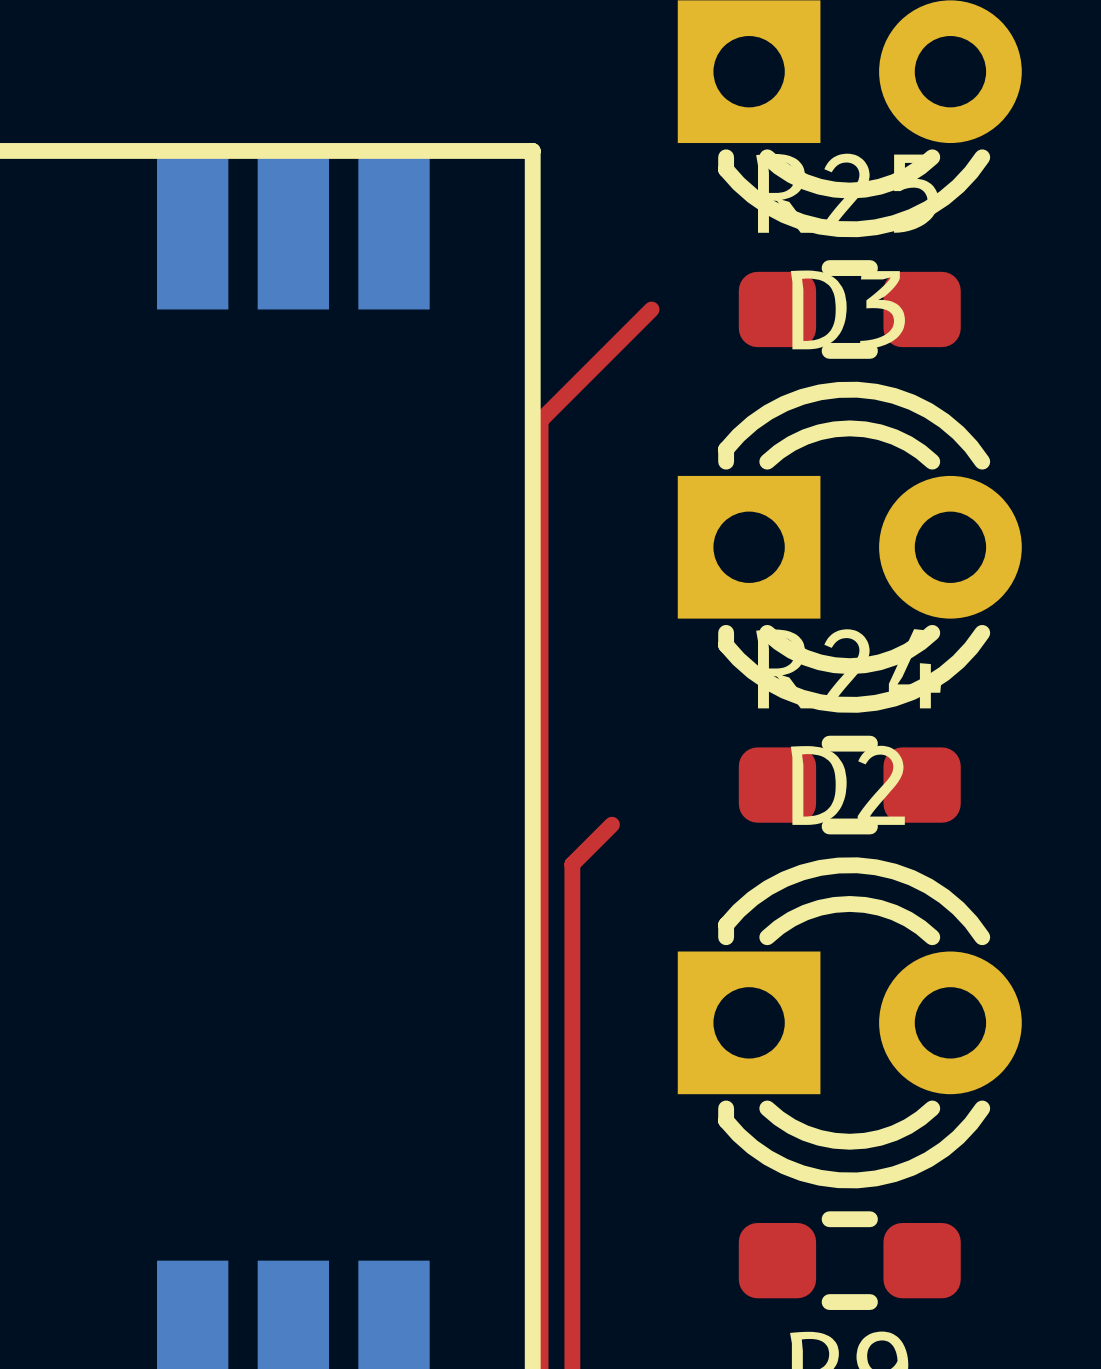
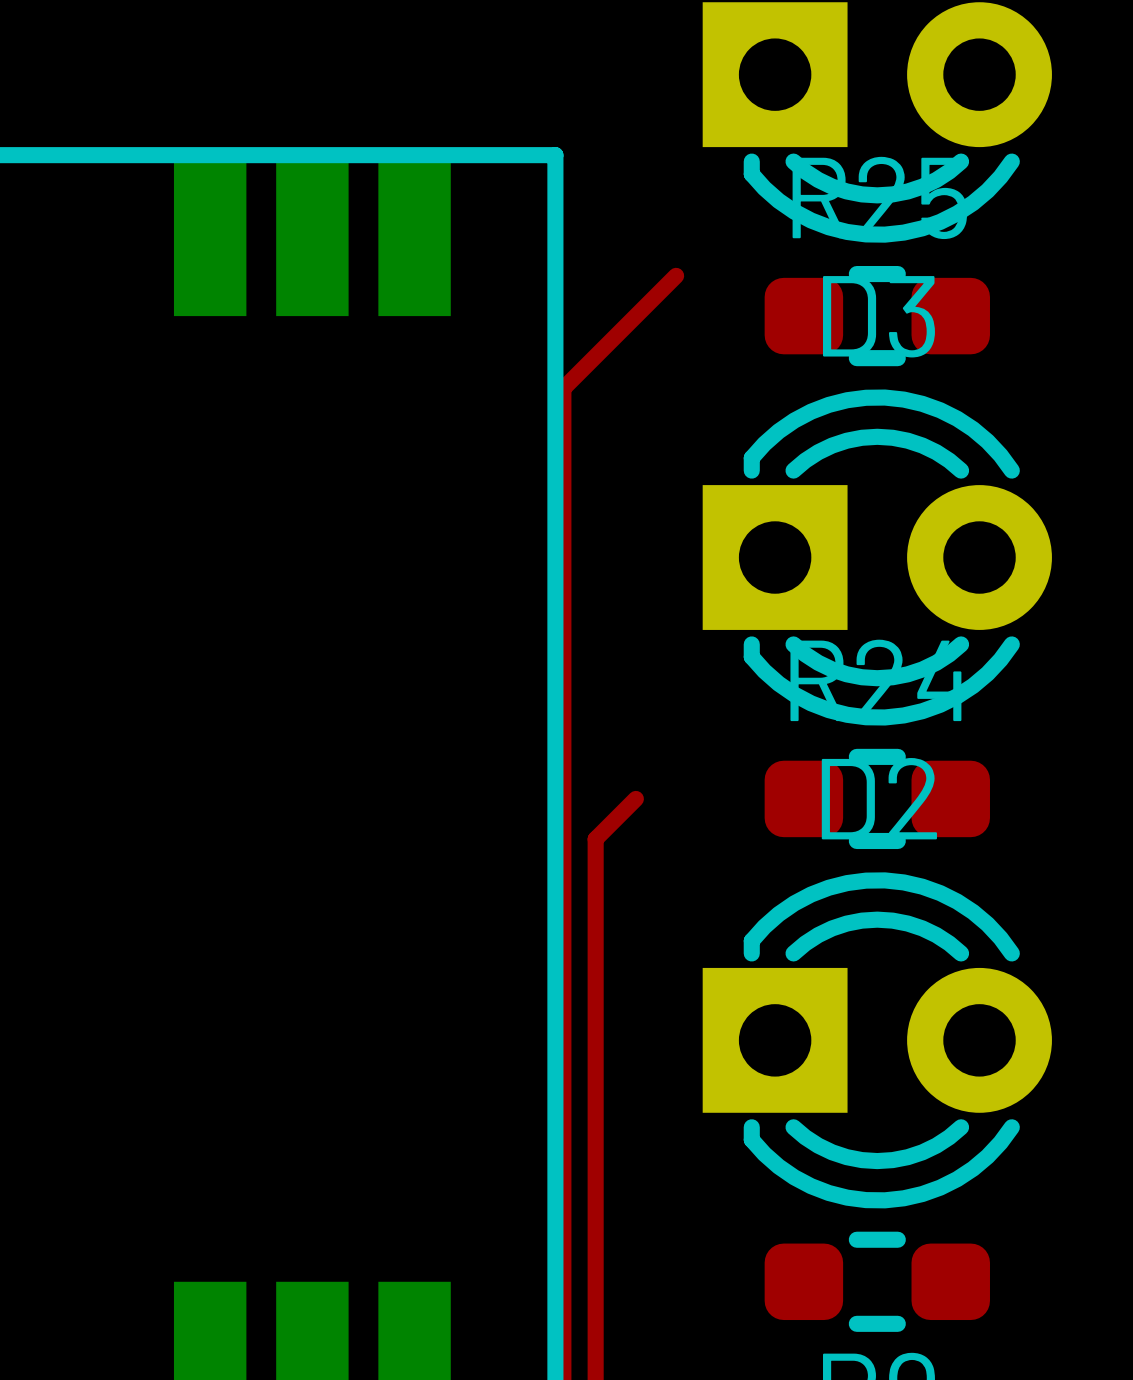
top track: (651, 309) (540, 420) -> (676, 275) (563, 388) (563, 428)
top track: (611, 824) (572, 864) -> (635, 798) (595, 839) (595, 879)

